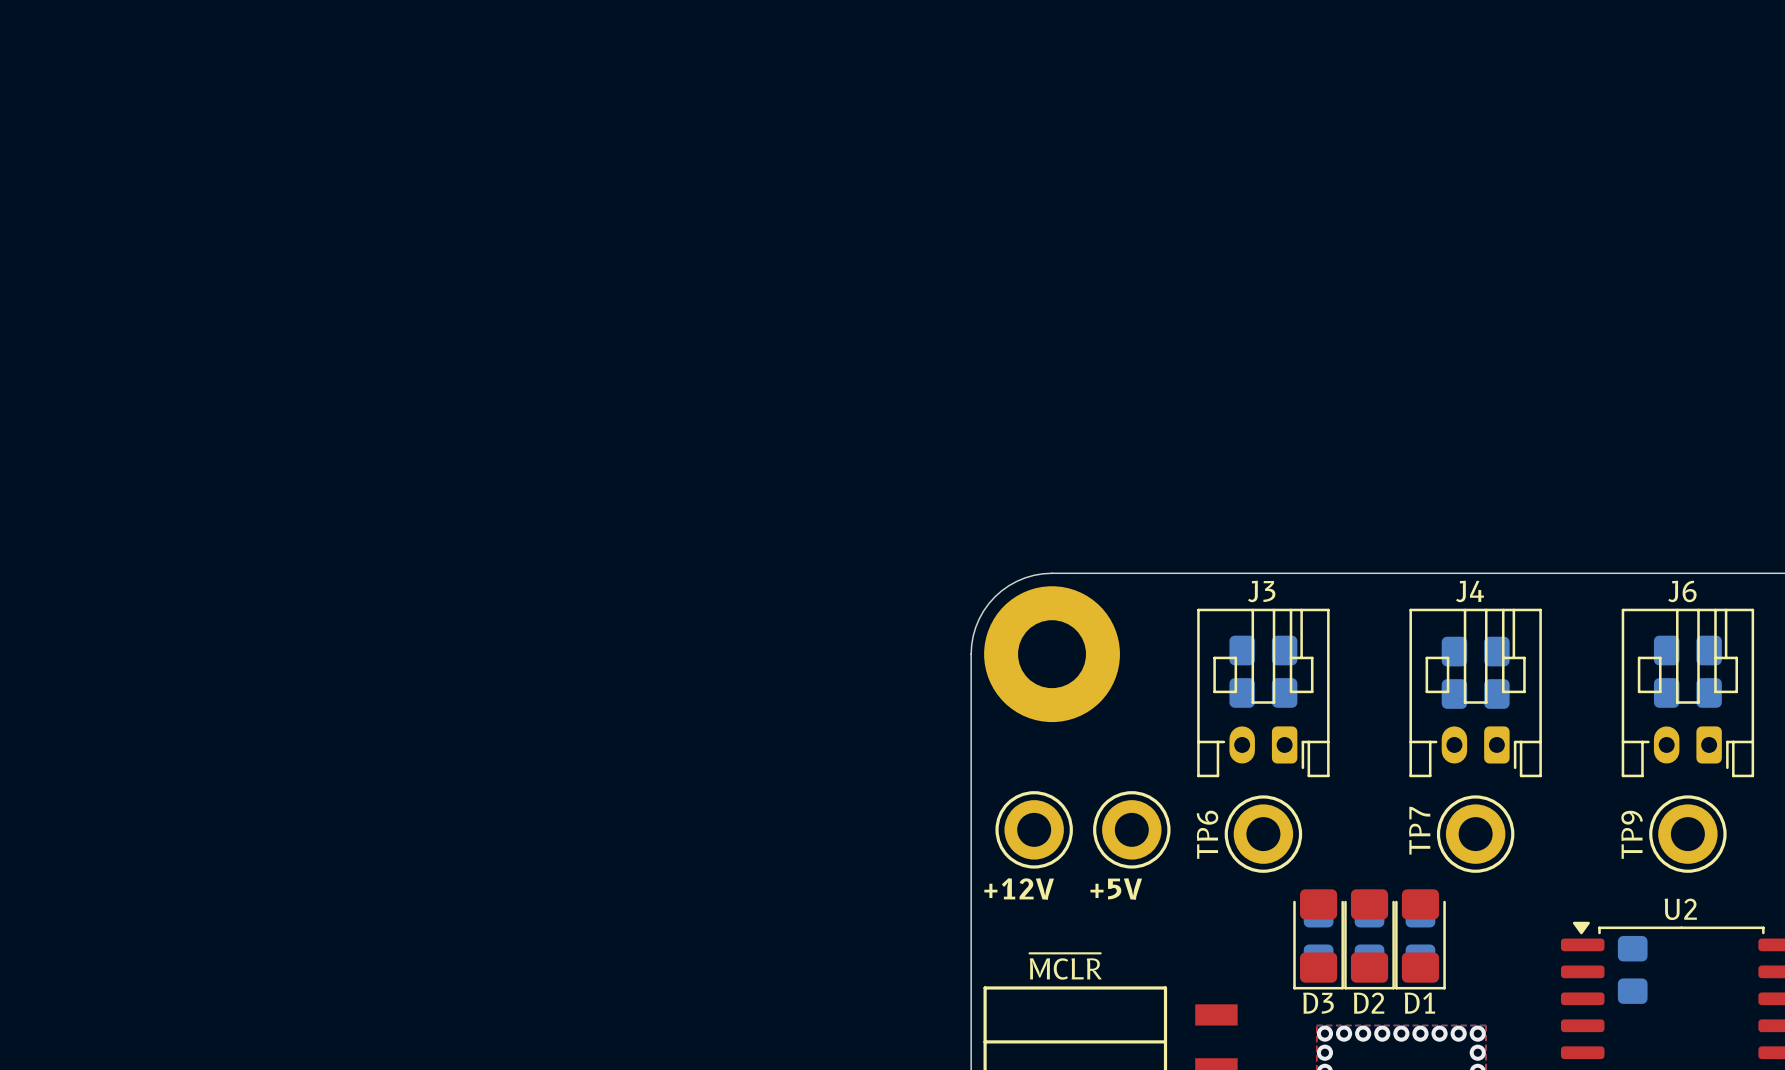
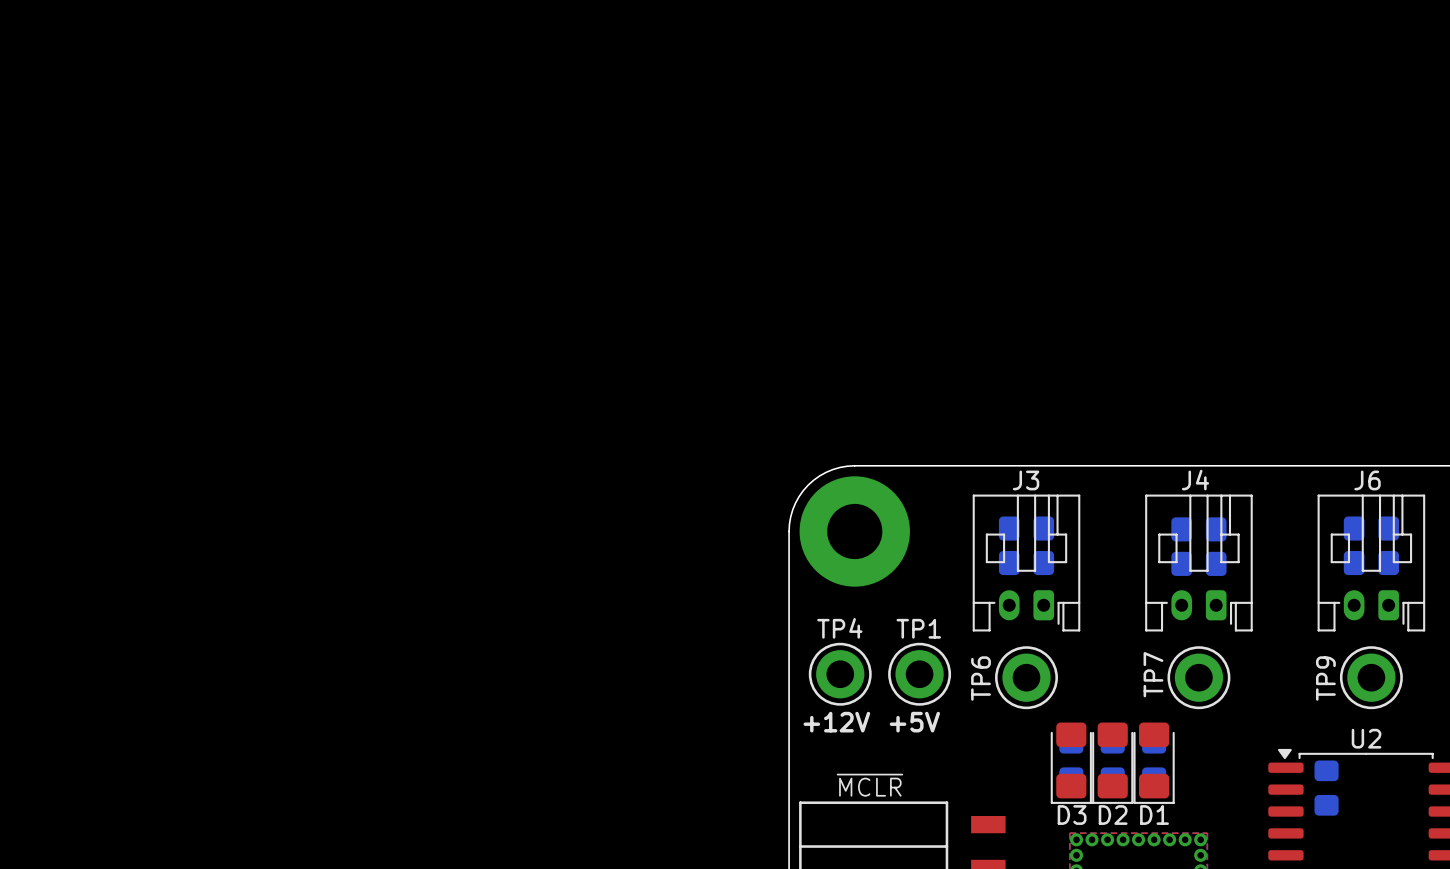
TP4 name: none -> TP4 (839, 628)
TP1 name: none -> TP1 (918, 628)

